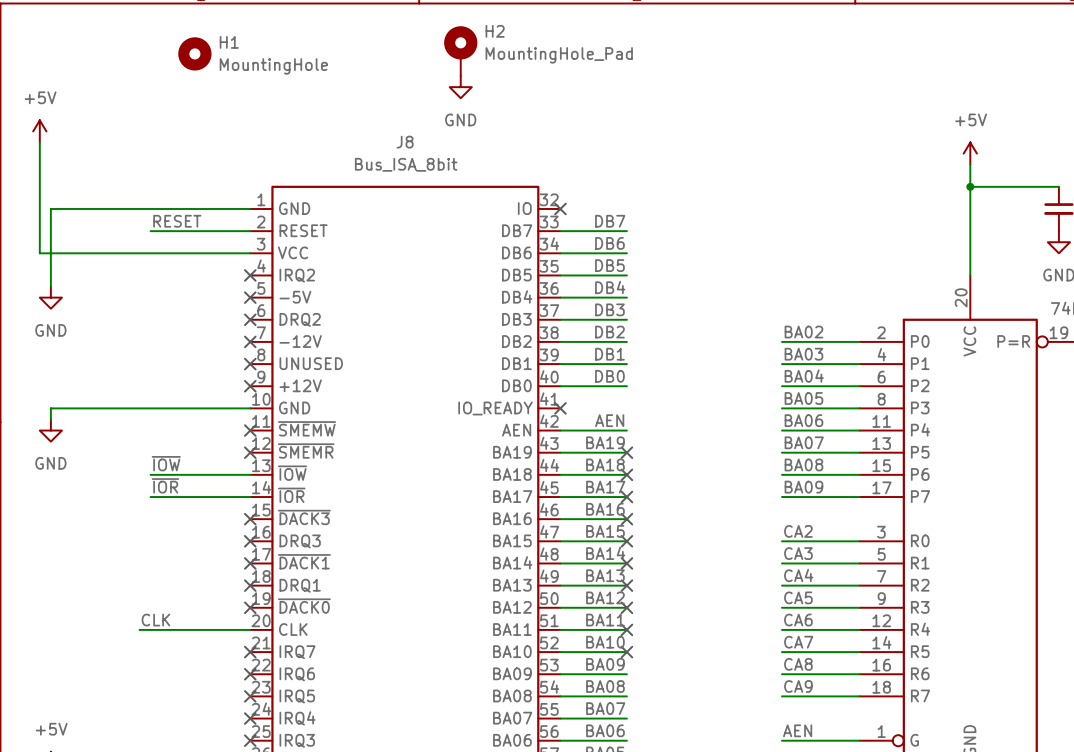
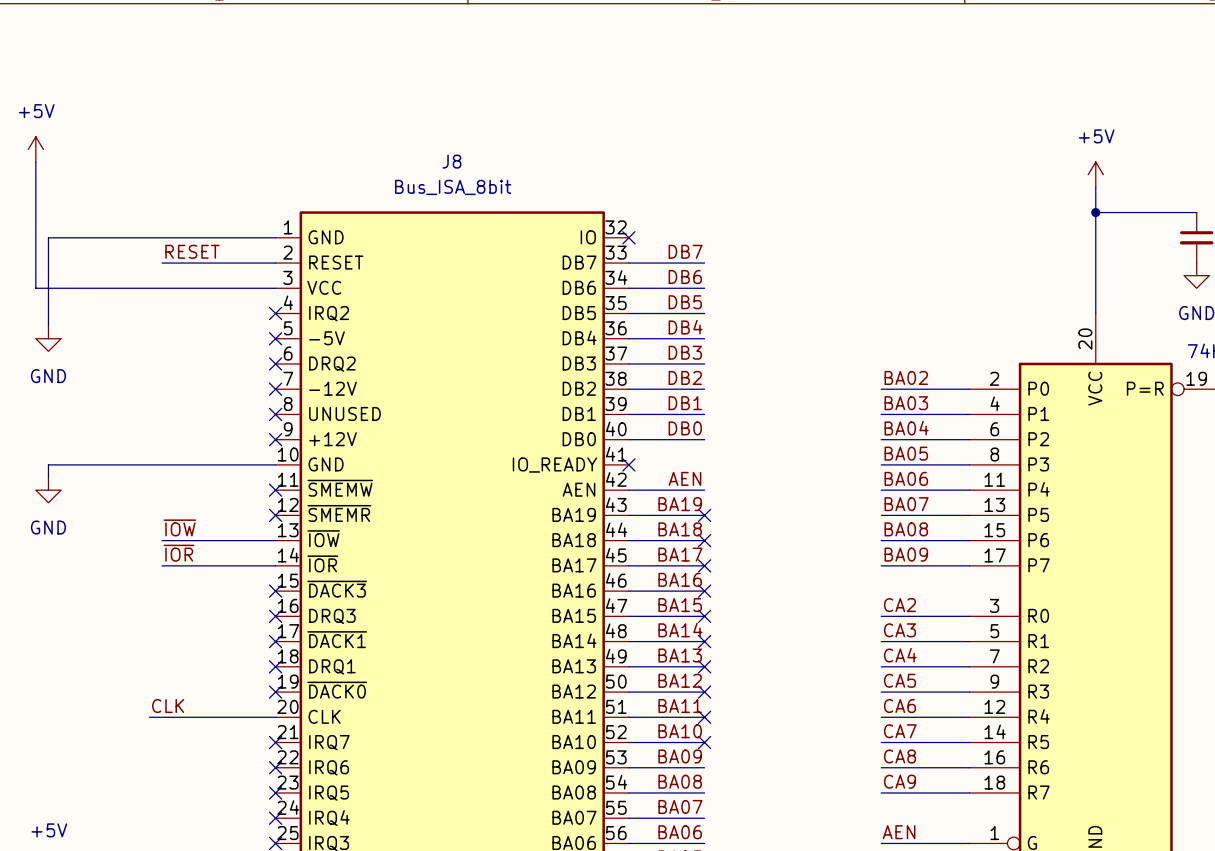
H2: MountingHole_Pad (460, 51) -> none
H1: MountingHole (194, 53) -> none
power symbol: GND (460, 87) -> none

